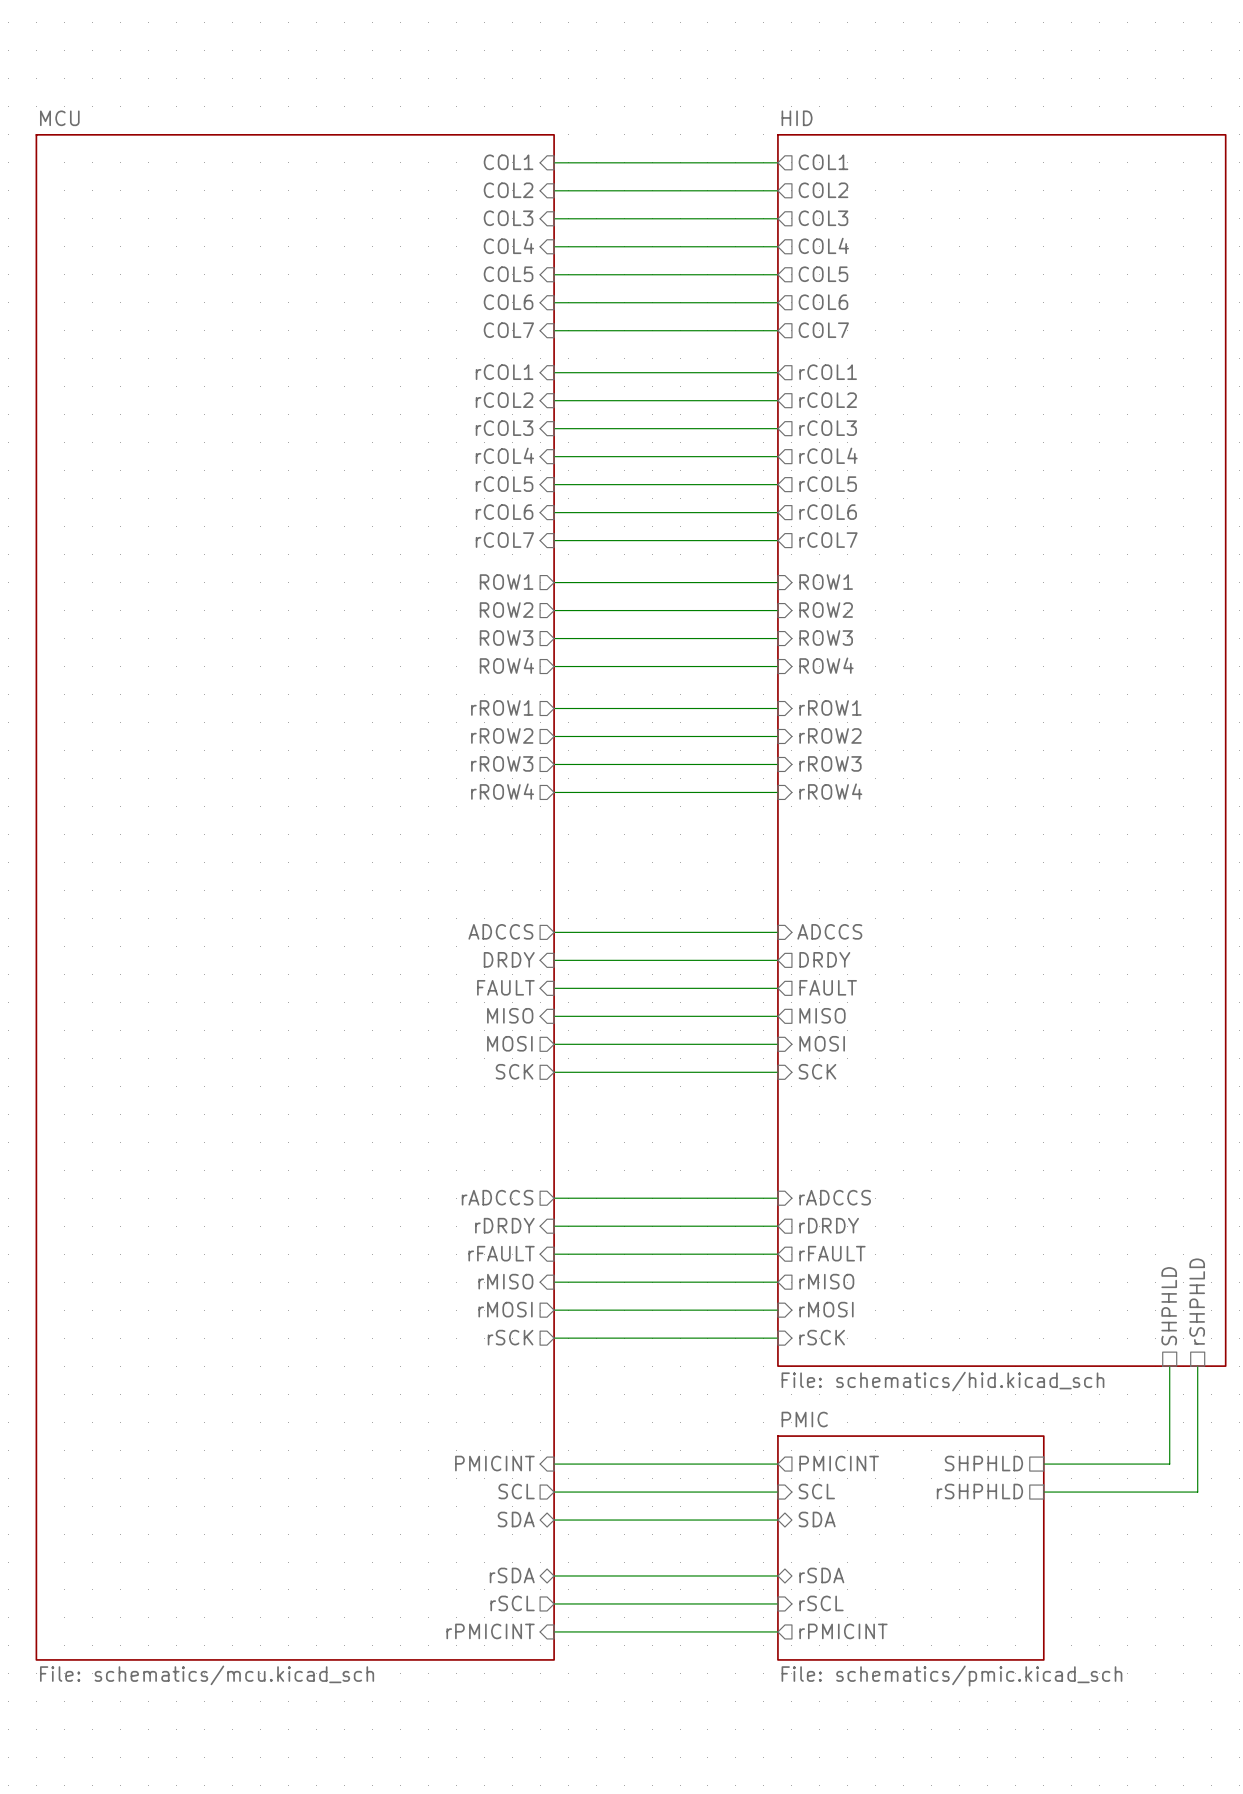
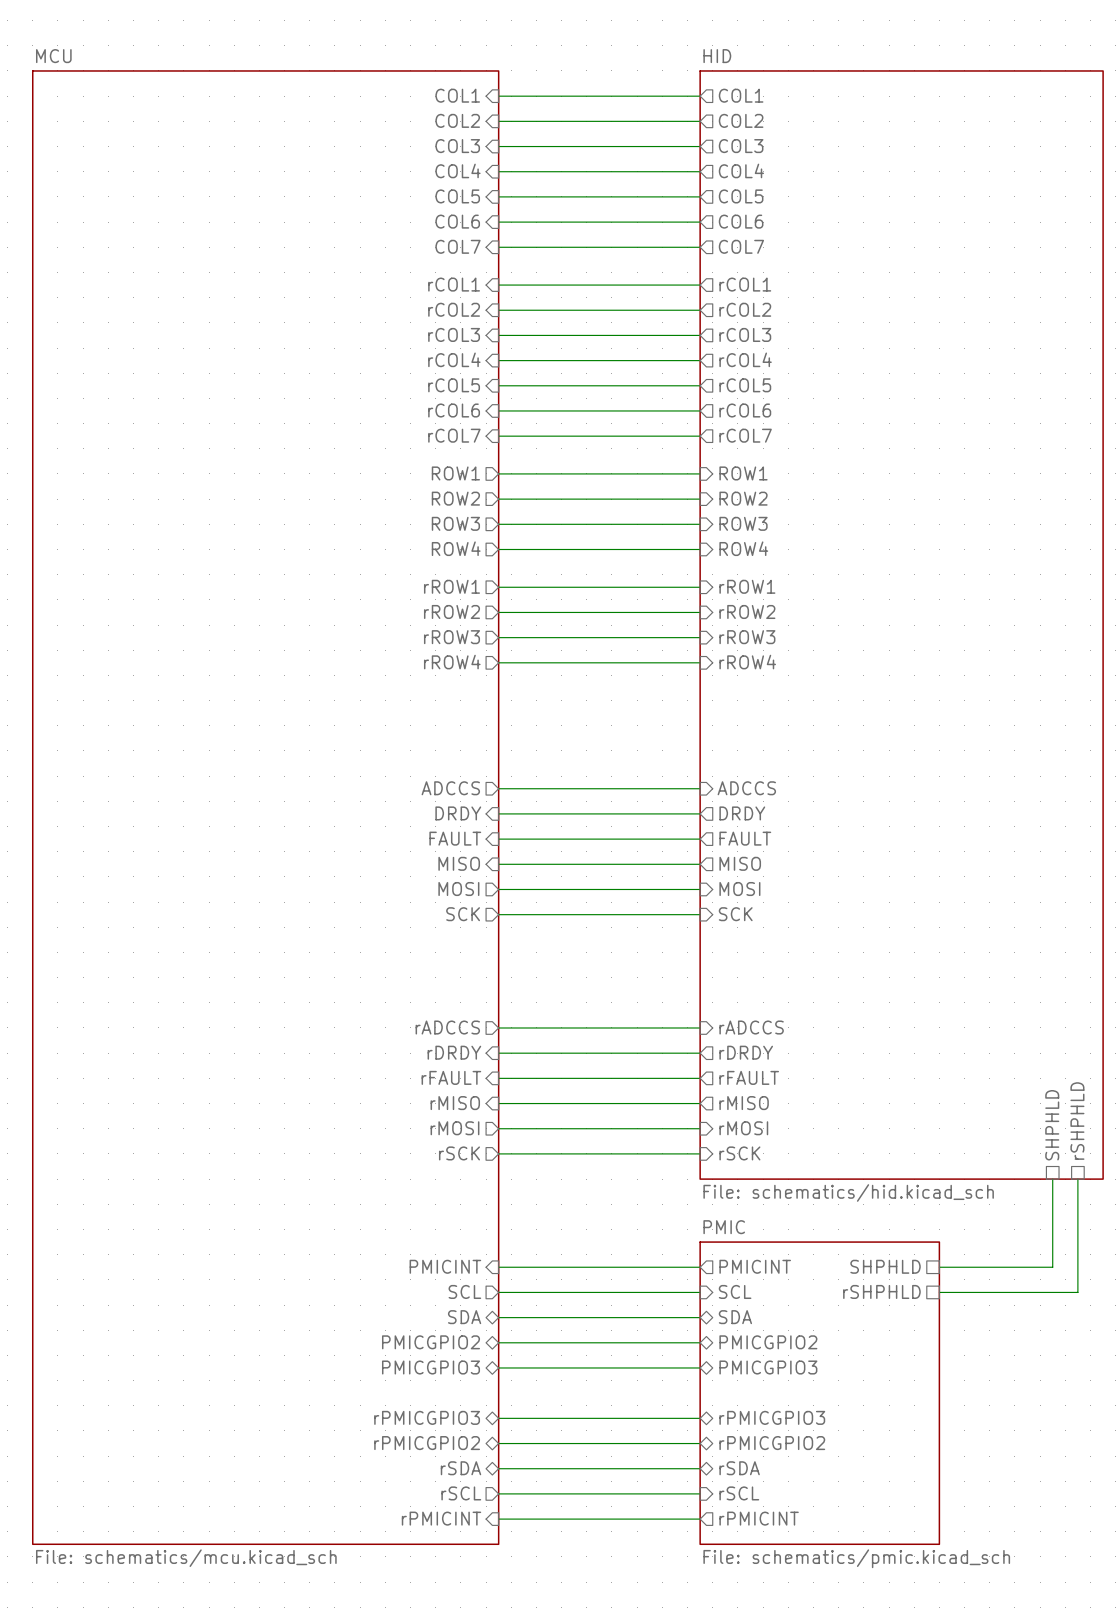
sheet pin: none -> COL1 (457, 95)
wire: none -> (498, 96) (700, 96)
sheet pin: none -> COL1 (741, 95)
sheet MCU name position: MCU (59, 118) -> MCU (53, 56)
sheet MCU shape: [35, 134, 555, 1661] -> [31, 70, 500, 1546]
sheet pin: none -> COL2 (457, 120)
wire: none -> (498, 121) (700, 121)
sheet pin: none -> COL2 (741, 120)
sheet pin: COL1 (508, 162) -> COL3 (457, 146)
sheet pin: COL1 (823, 162) -> COL3 (741, 146)
sheet pin: COL2 (508, 190) -> COL4 (457, 170)
sheet pin: COL2 (823, 190) -> COL4 (741, 170)
sheet pin: COL3 (508, 218) -> COL5 (457, 196)
sheet pin: COL3 (823, 218) -> COL5 (741, 196)
sheet pin: COL4 (508, 245) -> COL6 (457, 221)
sheet pin: COL4 (823, 245) -> COL6 (741, 221)
sheet pin: COL5 (508, 274) -> COL7 (457, 246)
sheet pin: COL5 (823, 274) -> COL7 (741, 246)
sheet pin: COL6 (508, 302) -> none
wire: (554, 302) (777, 302) -> (498, 285) (700, 285)
sheet pin: COL6 (823, 302) -> none
sheet pin: none -> rCOL1 (454, 284)
sheet pin: none -> rCOL1 (745, 284)
sheet pin: COL7 (508, 330) -> none
wire: (554, 330) (777, 330) -> (498, 310) (700, 310)
sheet pin: COL7 (823, 330) -> none
sheet pin: none -> rCOL2 (454, 309)
sheet pin: none -> rCOL2 (745, 309)
sheet pin: rCOL1 (504, 372) -> rCOL3 (454, 334)
sheet pin: rCOL1 (828, 372) -> rCOL3 (745, 334)
sheet pin: rCOL2 (504, 400) -> rCOL4 (454, 359)
sheet pin: rCOL2 (828, 400) -> rCOL4 (745, 359)
sheet pin: rCOL3 (504, 428) -> rCOL5 (454, 385)
sheet pin: rCOL3 (828, 428) -> rCOL5 (745, 385)
sheet pin: rCOL4 (504, 455) -> rCOL6 (454, 410)
sheet pin: rCOL4 (828, 455) -> rCOL6 (745, 410)
sheet pin: rCOL5 (504, 484) -> rCOL7 (454, 435)
sheet pin: rCOL5 (828, 484) -> rCOL7 (745, 435)
sheet pin: rCOL6 (504, 512) -> none
wire: (554, 512) (777, 512) -> (498, 473) (700, 473)
sheet pin: rCOL6 (828, 512) -> none
sheet pin: none -> ROW1 (455, 473)
sheet pin: none -> ROW1 (743, 473)
sheet pin: rCOL7 (504, 540) -> none
wire: (554, 540) (777, 540) -> (498, 499) (700, 499)
sheet pin: rCOL7 (828, 540) -> none
sheet pin: none -> ROW2 (455, 498)
sheet pin: none -> ROW2 (743, 498)
sheet pin: ROW1 (506, 582) -> ROW3 (455, 523)
sheet pin: ROW1 (826, 582) -> ROW3 (743, 523)
sheet pin: ROW2 (506, 610) -> ROW4 (456, 548)
sheet pin: ROW2 (826, 610) -> ROW4 (743, 548)
sheet pin: ROW3 (506, 638) -> none
wire: (554, 638) (777, 638) -> (498, 587) (700, 587)
sheet pin: ROW3 (826, 638) -> none
sheet pin: none -> rROW1 (451, 586)
sheet pin: none -> rROW1 (747, 586)
sheet pin: ROW4 (506, 665) -> none
sheet pin: ROW4 (826, 665) -> none
wire: (554, 666) (777, 666) -> (498, 612) (700, 612)
sheet pin: none -> rROW2 (451, 611)
sheet pin: none -> rROW2 (747, 611)
sheet pin: rROW1 (502, 707) -> rROW3 (451, 637)
sheet pin: rROW1 (830, 707) -> rROW3 (747, 637)
sheet pin: rROW2 (502, 735) -> rROW4 (452, 662)
sheet pin: rROW2 (830, 735) -> rROW4 (747, 662)
sheet HID position: (1001, 750) -> (901, 625)
sheet pin: rROW3 (502, 763) -> none
sheet pin: rROW3 (830, 763) -> none
wire: (554, 764) (777, 764) -> none
sheet pin: rROW4 (502, 791) -> none
sheet pin: rROW4 (830, 791) -> none
wire: (554, 792) (777, 792) -> none
sheet pin: none -> ADCCS (450, 788)
sheet pin: none -> ADCCS (746, 788)
sheet pin: none -> DRDY (458, 813)
sheet pin: none -> DRDY (742, 813)
sheet pin shape: output (500, 931) -> input (455, 838)
sheet pin: ADCCS (500, 931) -> FAULT (455, 838)
sheet pin shape: input (829, 931) -> output (745, 838)
sheet pin: ADCCS (829, 931) -> FAULT (745, 838)
sheet pin: DRDY (509, 959) -> MISO (459, 863)
sheet pin: DRDY (824, 959) -> MISO (740, 863)
sheet pin shape: input (505, 987) -> output (458, 889)
sheet pin: FAULT (505, 987) -> MOSI (458, 889)
sheet pin shape: output (828, 987) -> input (739, 889)
sheet pin: FAULT (828, 987) -> MOSI (739, 889)
sheet pin shape: input (510, 1015) -> output (463, 914)
sheet pin: MISO (510, 1015) -> SCK (463, 914)
sheet pin shape: output (822, 1015) -> input (735, 914)
sheet pin: MISO (822, 1015) -> SCK (735, 914)
sheet pin: MOSI (509, 1043) -> none
sheet pin: MOSI (822, 1043) -> none
wire: (554, 1044) (777, 1044) -> (498, 788) (700, 788)
sheet pin: SCK (514, 1071) -> none
sheet pin: SCK (817, 1071) -> none
wire: (554, 1072) (777, 1072) -> (498, 813) (700, 813)
sheet pin: none -> rADCCS (447, 1027)
sheet pin: none -> rADCCS (751, 1027)
sheet pin: none -> rDRDY (454, 1052)
sheet pin: none -> rDRDY (746, 1052)
sheet pin shape: output (497, 1197) -> input (451, 1077)
sheet pin: rADCCS (497, 1197) -> rFAULT (451, 1077)
sheet pin shape: input (835, 1197) -> output (749, 1077)
sheet pin: rADCCS (835, 1197) -> rFAULT (749, 1077)
sheet pin: rDRDY (504, 1225) -> rMISO (455, 1103)
sheet pin: rDRDY (829, 1225) -> rMISO (744, 1103)
sheet pin shape: input (501, 1253) -> output (454, 1128)
sheet pin: rFAULT (501, 1253) -> rMOSI (454, 1128)
sheet pin shape: output (832, 1253) -> input (743, 1128)
sheet pin: rFAULT (832, 1253) -> rMOSI (743, 1128)
sheet pin shape: input (505, 1281) -> output (459, 1153)
sheet pin: rMISO (505, 1281) -> rSCK (459, 1153)
sheet pin shape: output (826, 1281) -> input (739, 1153)
sheet pin: rMISO (826, 1281) -> rSCK (739, 1153)
sheet pin position: rSHPHLD (1197, 1301) -> rSHPHLD (1077, 1121)
sheet pin position: SHPHLD (1169, 1306) -> SHPHLD (1052, 1125)
sheet pin: rMOSI (505, 1309) -> none
sheet pin: rMOSI (826, 1309) -> none
wire: (554, 1310) (777, 1310) -> (498, 1027) (700, 1027)
wire: none -> (1052, 1179) (1052, 1229)
wire: none -> (1077, 1179) (1077, 1229)
sheet pin: rSCK (510, 1337) -> none
sheet pin: rSCK (822, 1337) -> none
wire: (554, 1338) (777, 1338) -> (498, 1053) (700, 1053)
sheet pin: none -> PMICINT (445, 1266)
sheet pin: none -> PMICINT (755, 1266)
wire: none -> (498, 1267) (700, 1267)
wire: (1169, 1408) (1169, 1464) (1043, 1464) -> (1052, 1267) (939, 1267)
sheet PMIC name position: PMIC (804, 1419) -> PMIC (724, 1227)
sheet pin: none -> SCL (464, 1291)
sheet PMIC shape: [777, 1435, 1045, 1661] -> [699, 1241, 941, 1546]
sheet pin: none -> SCL (735, 1291)
wire: none -> (498, 1292) (700, 1292)
wire: (1197, 1436) (1197, 1492) (1043, 1492) -> (1077, 1292) (939, 1292)
sheet pin shape: input (494, 1463) -> bidirectional (464, 1317)
sheet pin: PMICINT (494, 1463) -> SDA (464, 1317)
sheet pin shape: output (839, 1463) -> bidirectional (735, 1317)
sheet pin: PMICINT (839, 1463) -> SDA (735, 1317)
sheet pin position: SHPHLD (983, 1463) -> SHPHLD (885, 1266)
sheet pin shape: output (516, 1491) -> bidirectional (431, 1342)
sheet pin: SCL (516, 1491) -> PMICGPIO2 (431, 1342)
sheet pin shape: input (816, 1491) -> bidirectional (768, 1342)
sheet pin: SCL (816, 1491) -> PMICGPIO2 (768, 1342)
sheet pin position: rSHPHLD (979, 1491) -> rSHPHLD (881, 1291)
sheet pin: SDA (516, 1519) -> PMICGPIO3 (431, 1367)
sheet pin: SDA (817, 1519) -> PMICGPIO3 (768, 1367)
sheet pin: rSDA (512, 1575) -> rPMICGPIO3 (427, 1417)
sheet pin: rSDA (821, 1575) -> rPMICGPIO3 (772, 1417)
sheet pin shape: output (512, 1603) -> bidirectional (427, 1443)
sheet pin: rSCL (512, 1603) -> rPMICGPIO2 (427, 1443)
sheet pin shape: input (821, 1603) -> bidirectional (772, 1443)
sheet pin: rSCL (821, 1603) -> rPMICGPIO2 (772, 1443)
sheet pin shape: input (490, 1631) -> bidirectional (460, 1468)
sheet pin: rPMICINT (490, 1631) -> rSDA (460, 1468)
sheet pin shape: output (843, 1631) -> bidirectional (739, 1468)
sheet pin: rPMICINT (843, 1631) -> rSDA (739, 1468)
sheet pin: none -> rSCL (461, 1493)
wire: none -> (498, 1493) (700, 1493)
sheet pin: none -> rSCL (739, 1493)
sheet MCU value position: File: schematics/mcu.kicad_sch (207, 1675) -> File: schematics/mcu.kicad_sch (186, 1558)
sheet PMIC value position: File: schematics/pmic.kicad_sch (951, 1676) -> File: schematics/pmic.kicad_sch (856, 1558)
sheet pin: none -> rPMICINT (441, 1518)
wire: none -> (498, 1519) (700, 1519)
sheet pin: none -> rPMICINT (759, 1518)

